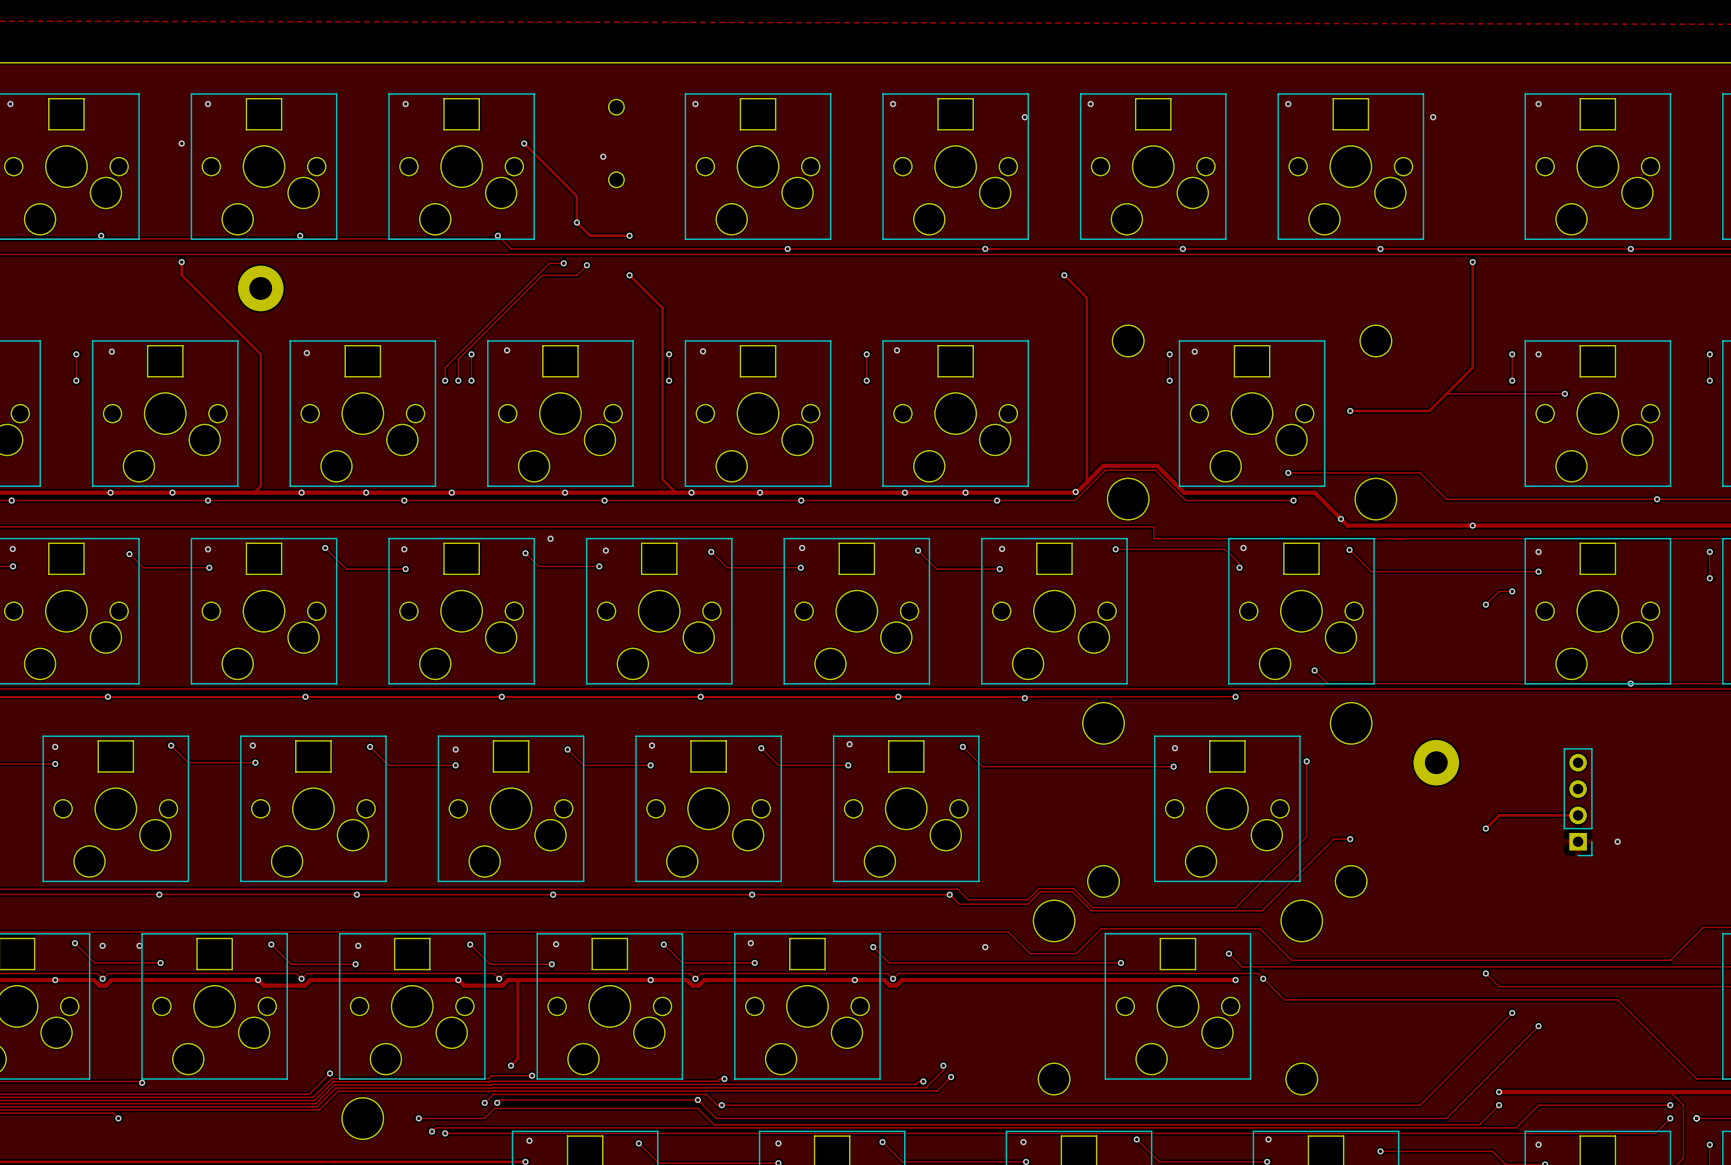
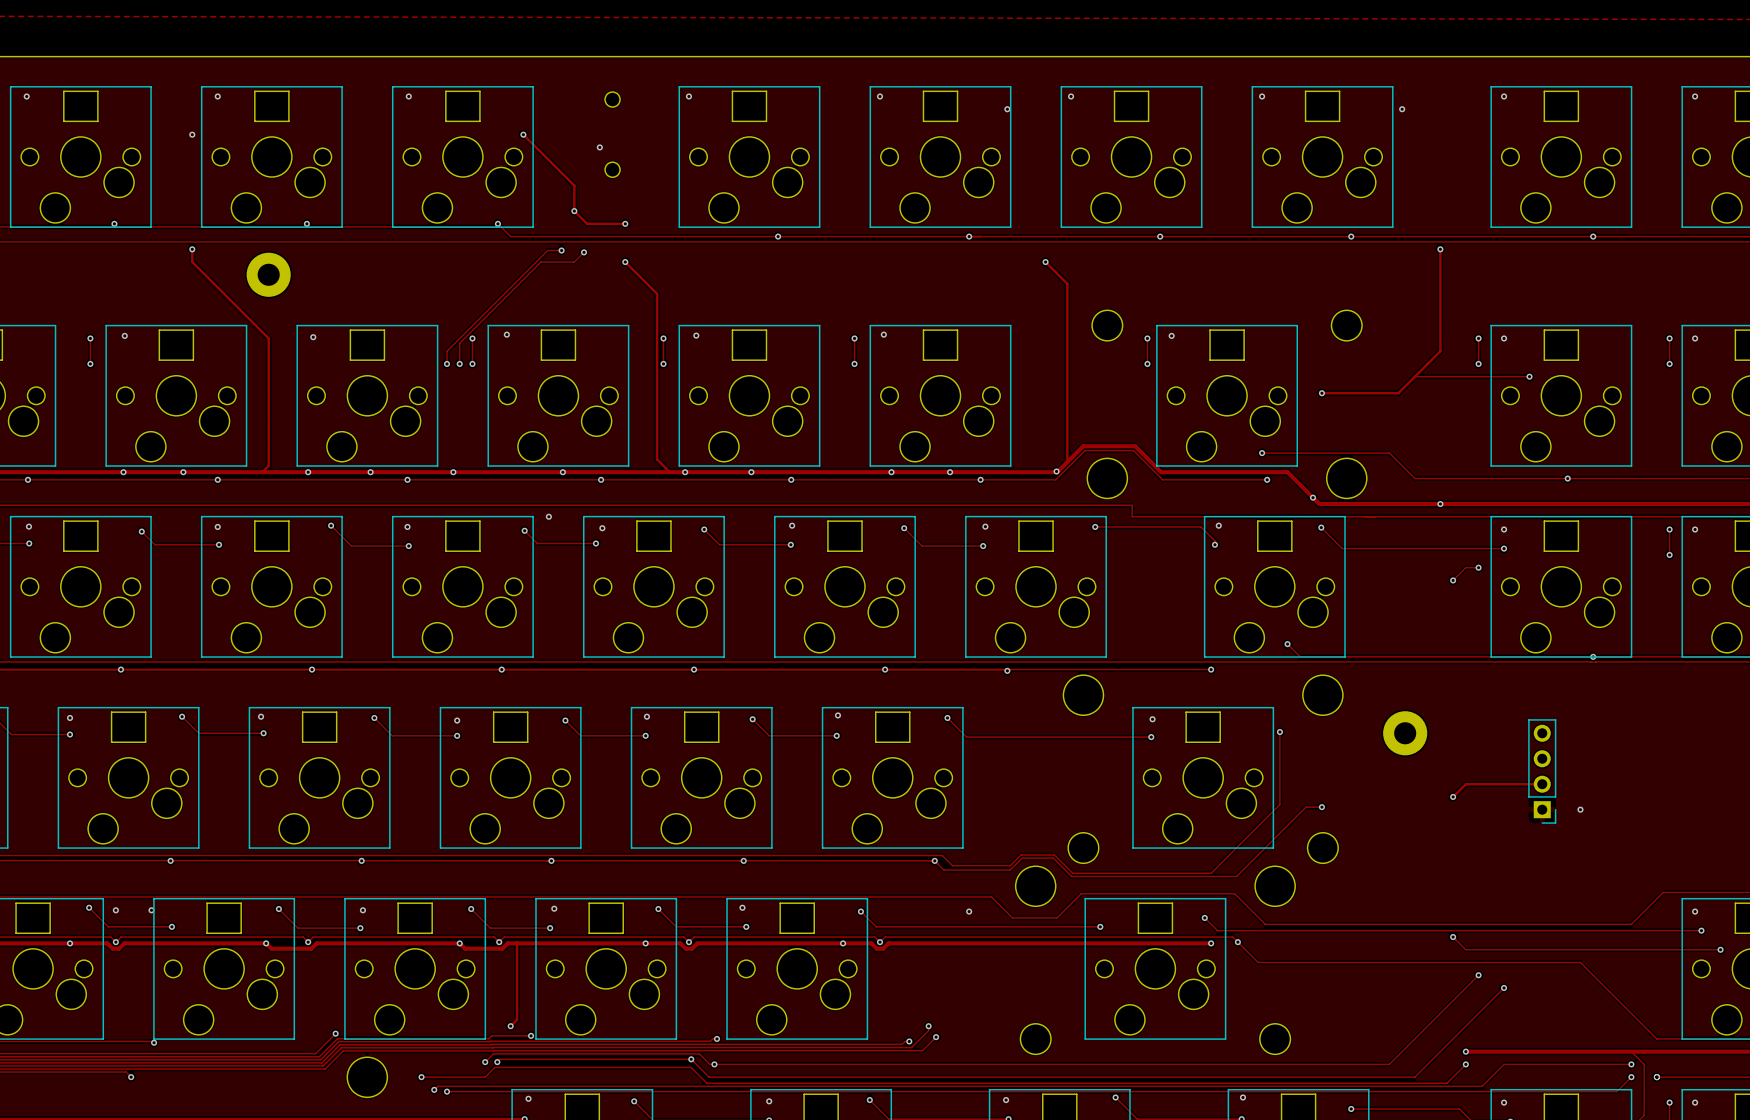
via position: (1657, 499) -> (1567, 478)

